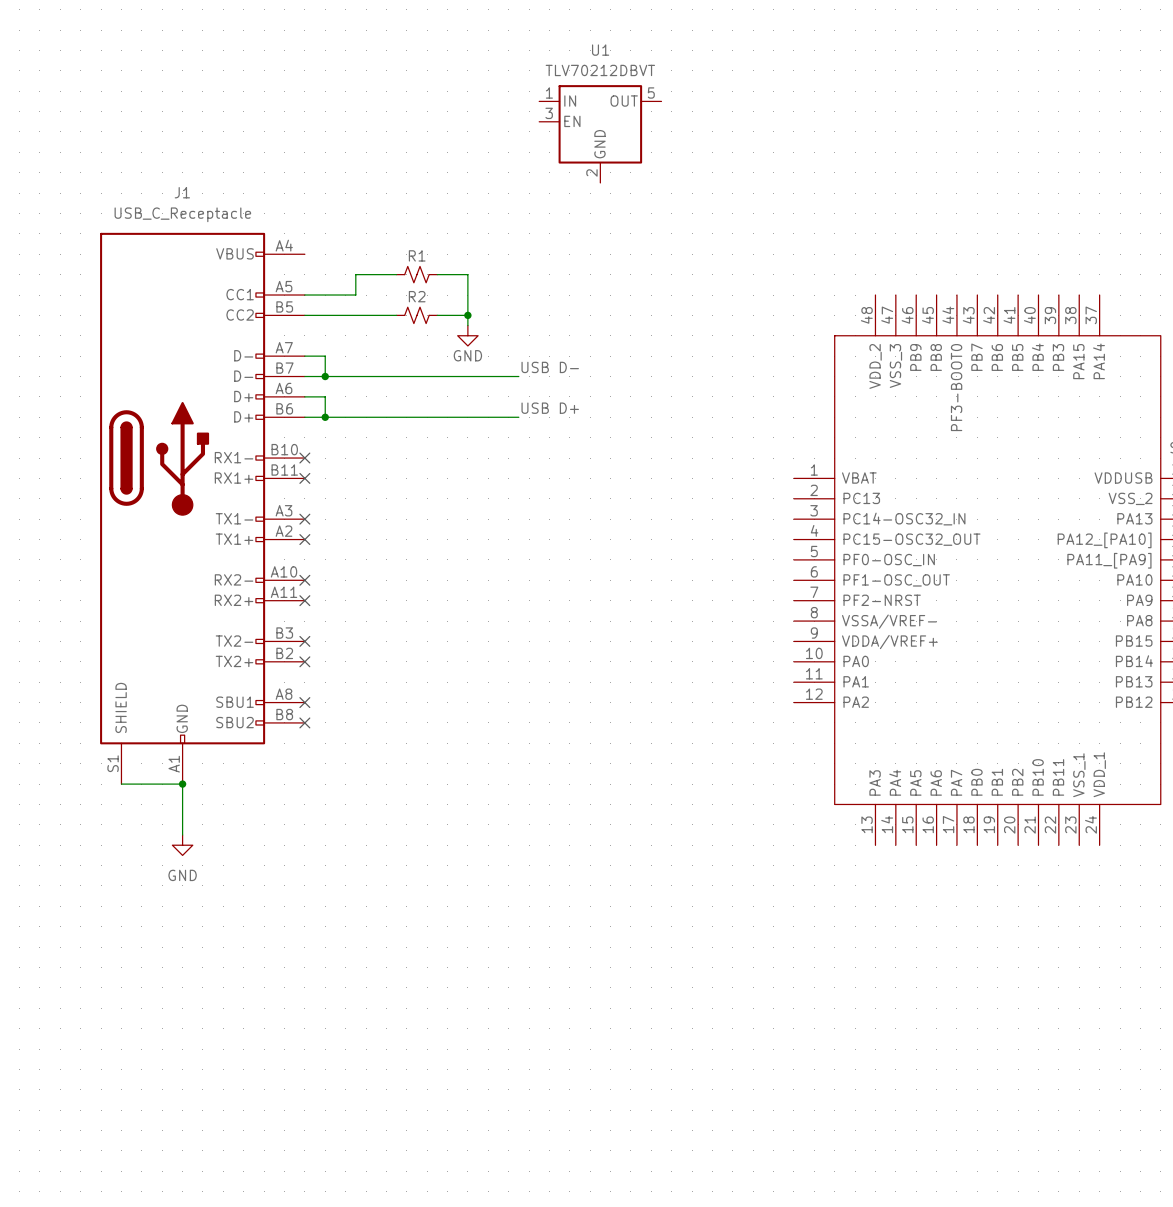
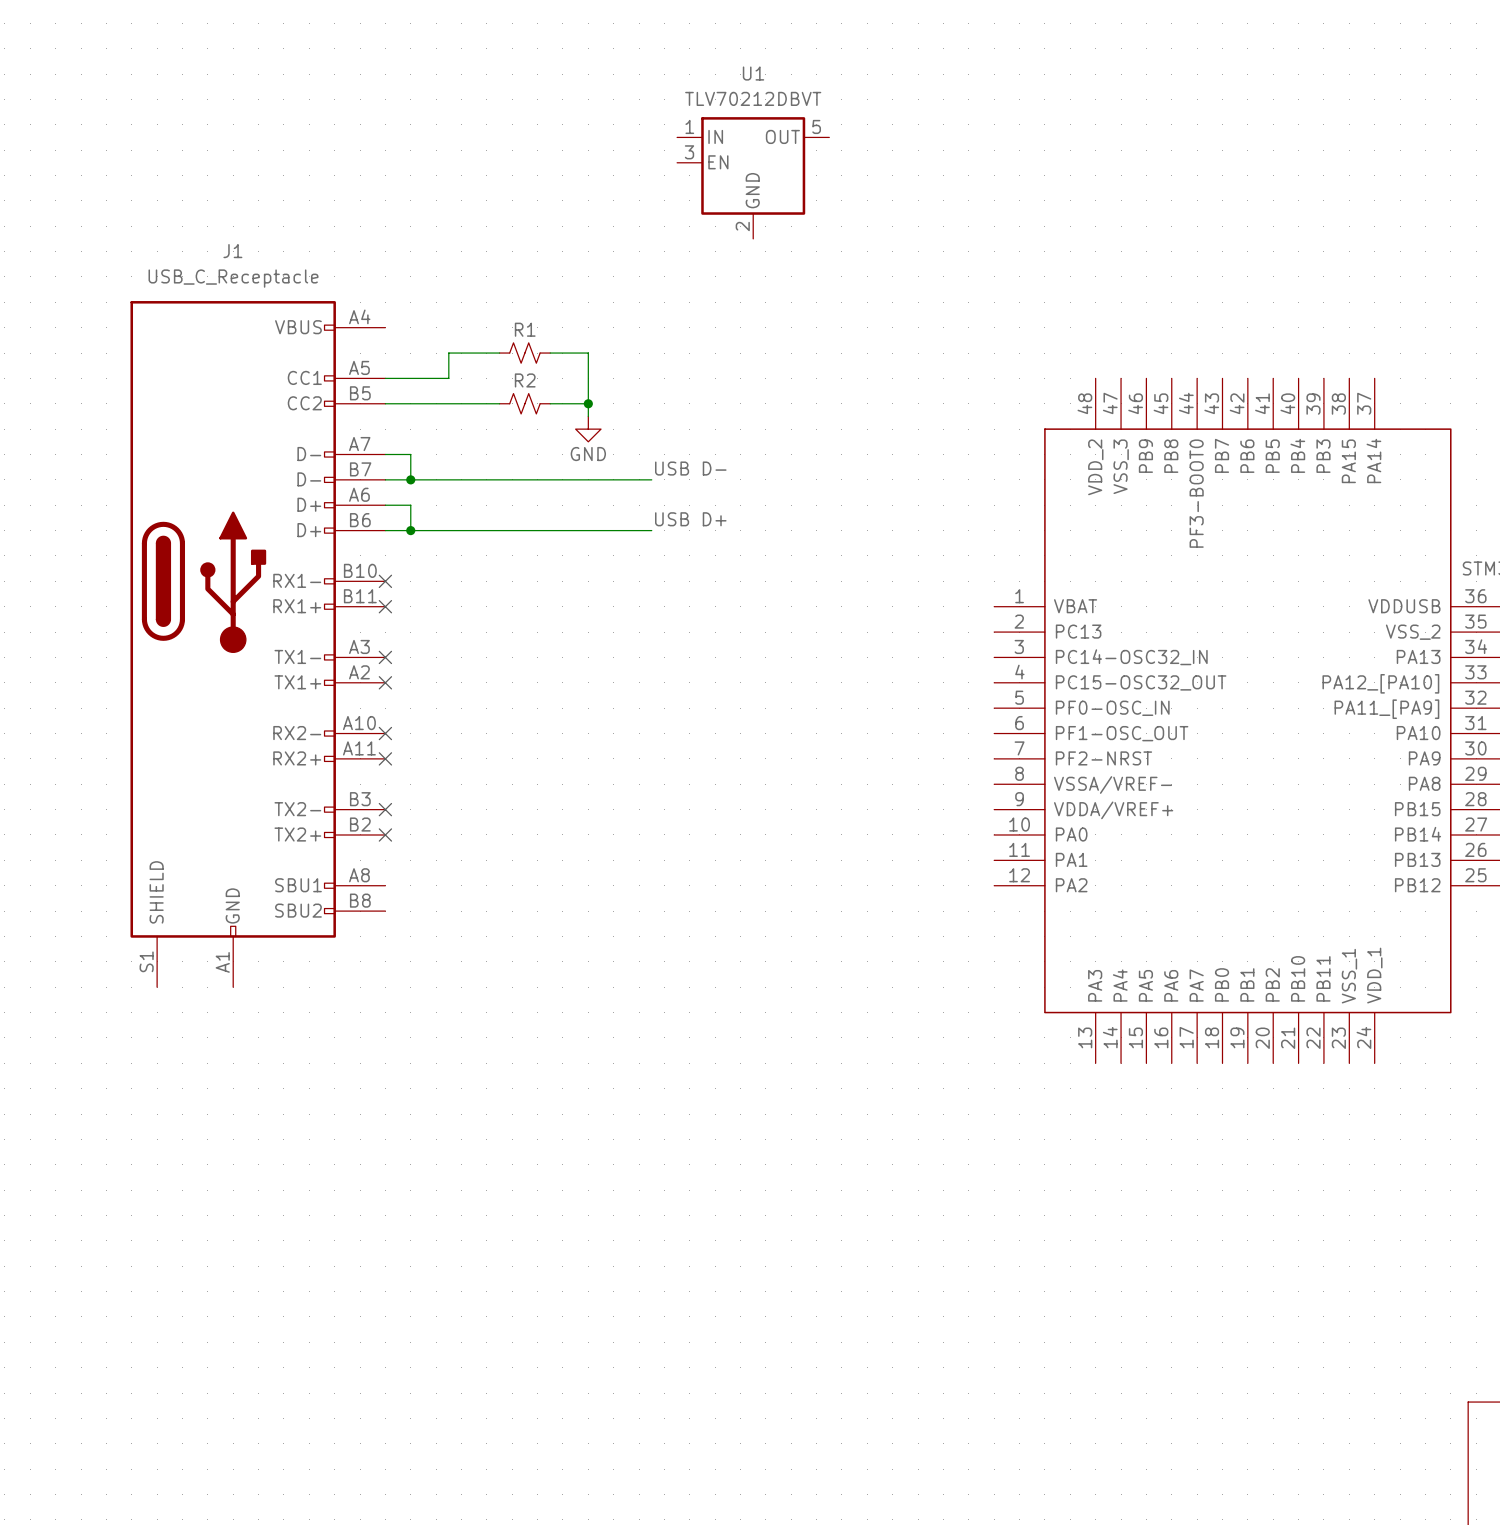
no-connect mark: (304, 702) -> none
no-connect mark: (304, 722) -> none
wire: (121, 784) (182, 784) (182, 835) -> none
junction: (182, 784) -> none
power symbol: GND (182, 845) -> none

